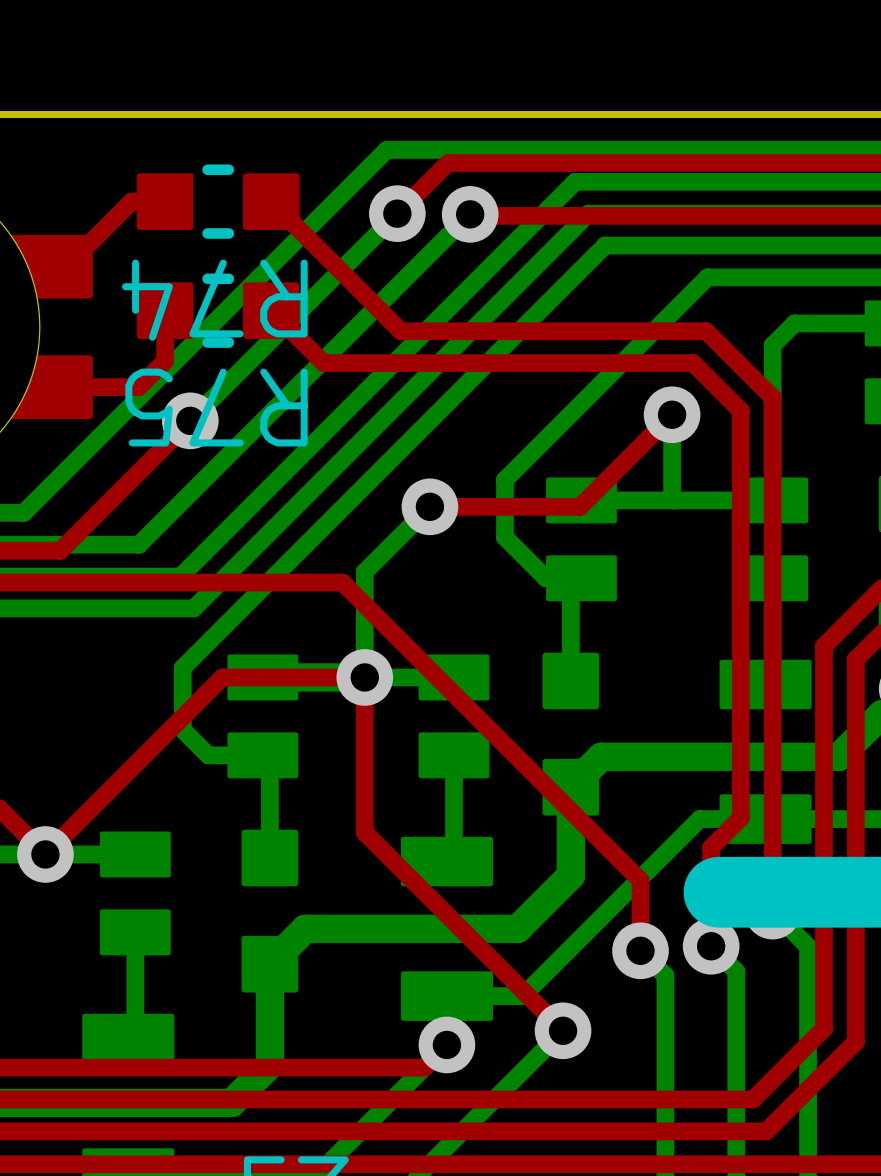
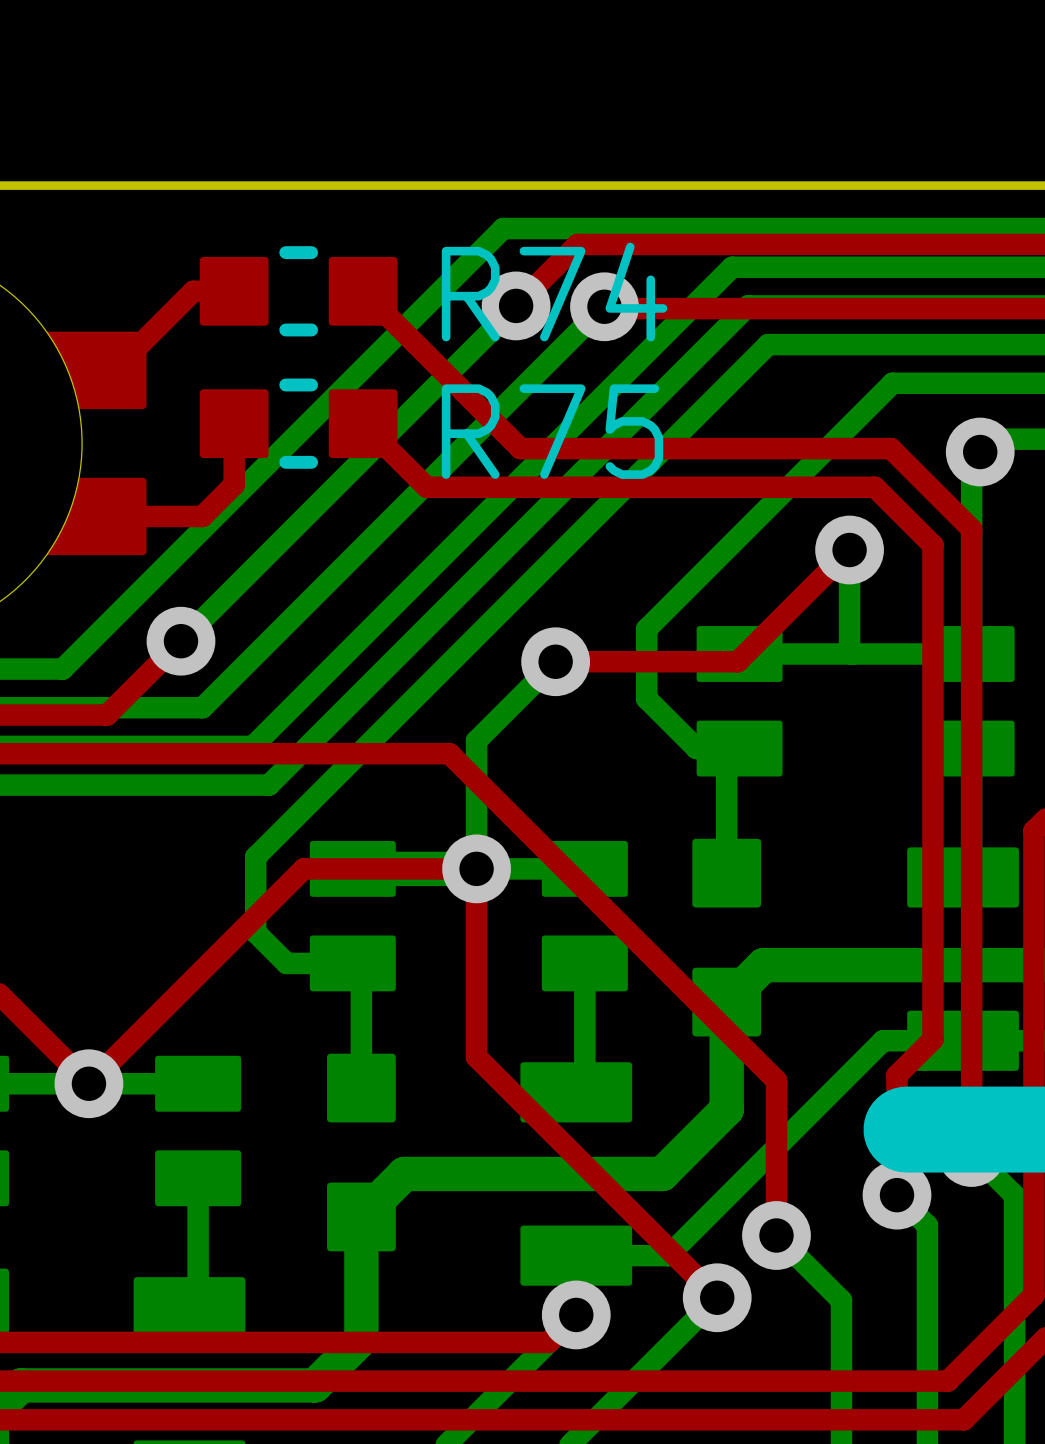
R74 name rotation: 0° (214, 300) -> 180° (554, 292)
via: none -> (980, 452)
R75 name rotation: 0° (216, 407) -> 180° (552, 431)
top track: (190, 420) (121, 489) -> none
bottom track: none -> (264, 557) (180, 641)
via position: (190, 420) -> (180, 641)
top track: (611, 851) (640, 880) (640, 950) -> (776, 1080) (776, 1235)
bottom track: (640, 950) (665, 975) (665, 1033) -> (776, 1235) (841, 1300)
via position: (640, 950) -> (776, 1235)

